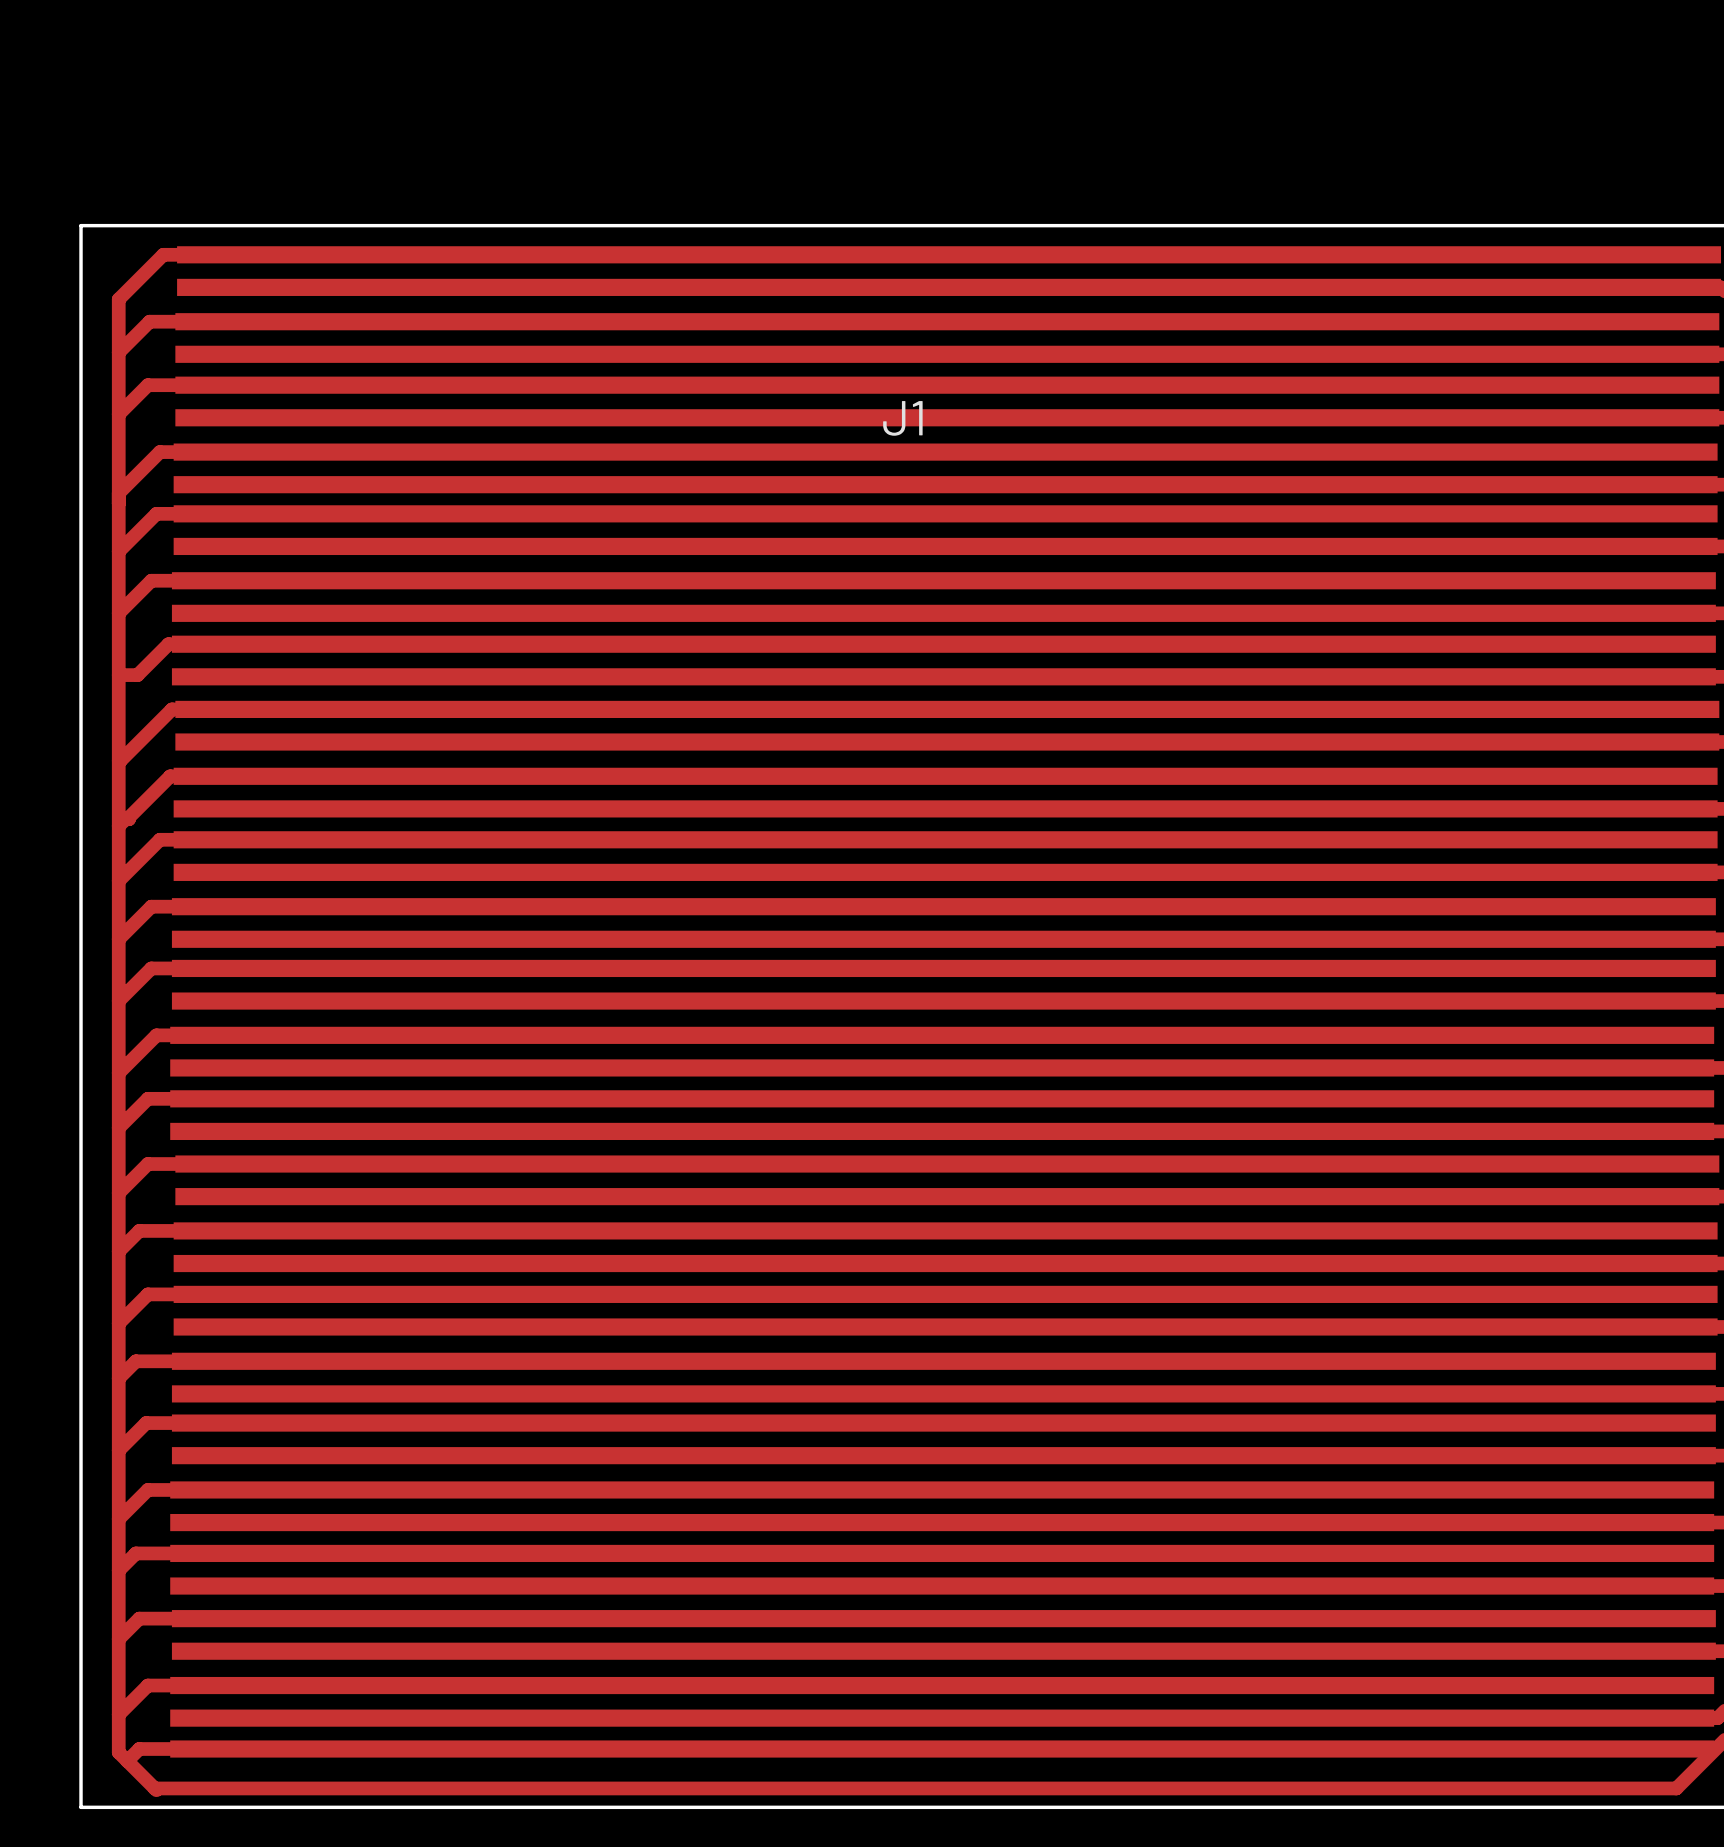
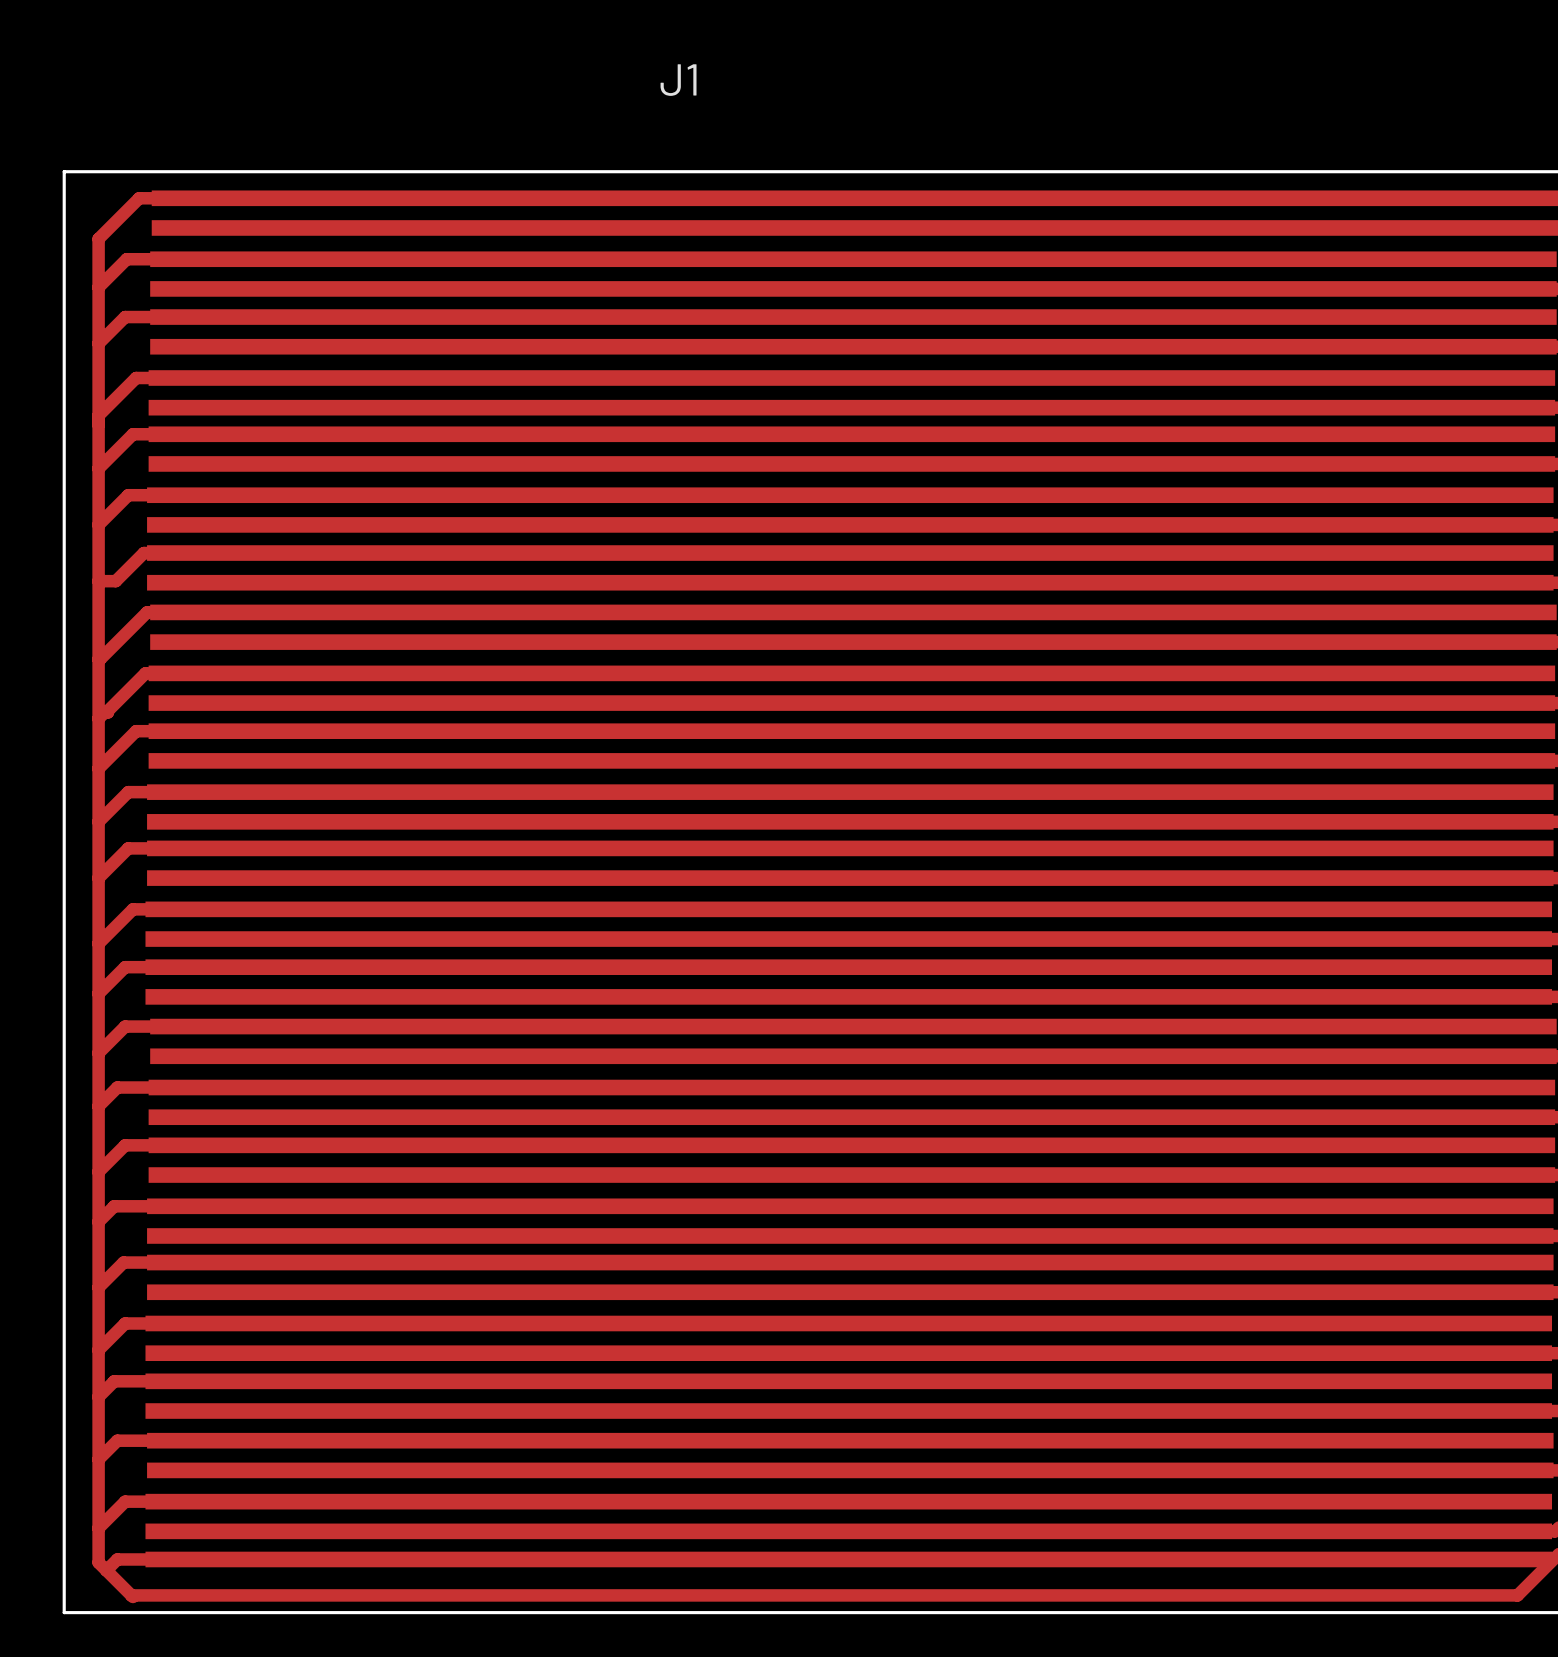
J1 name position: J1 (902, 418) -> J1 (678, 80)

